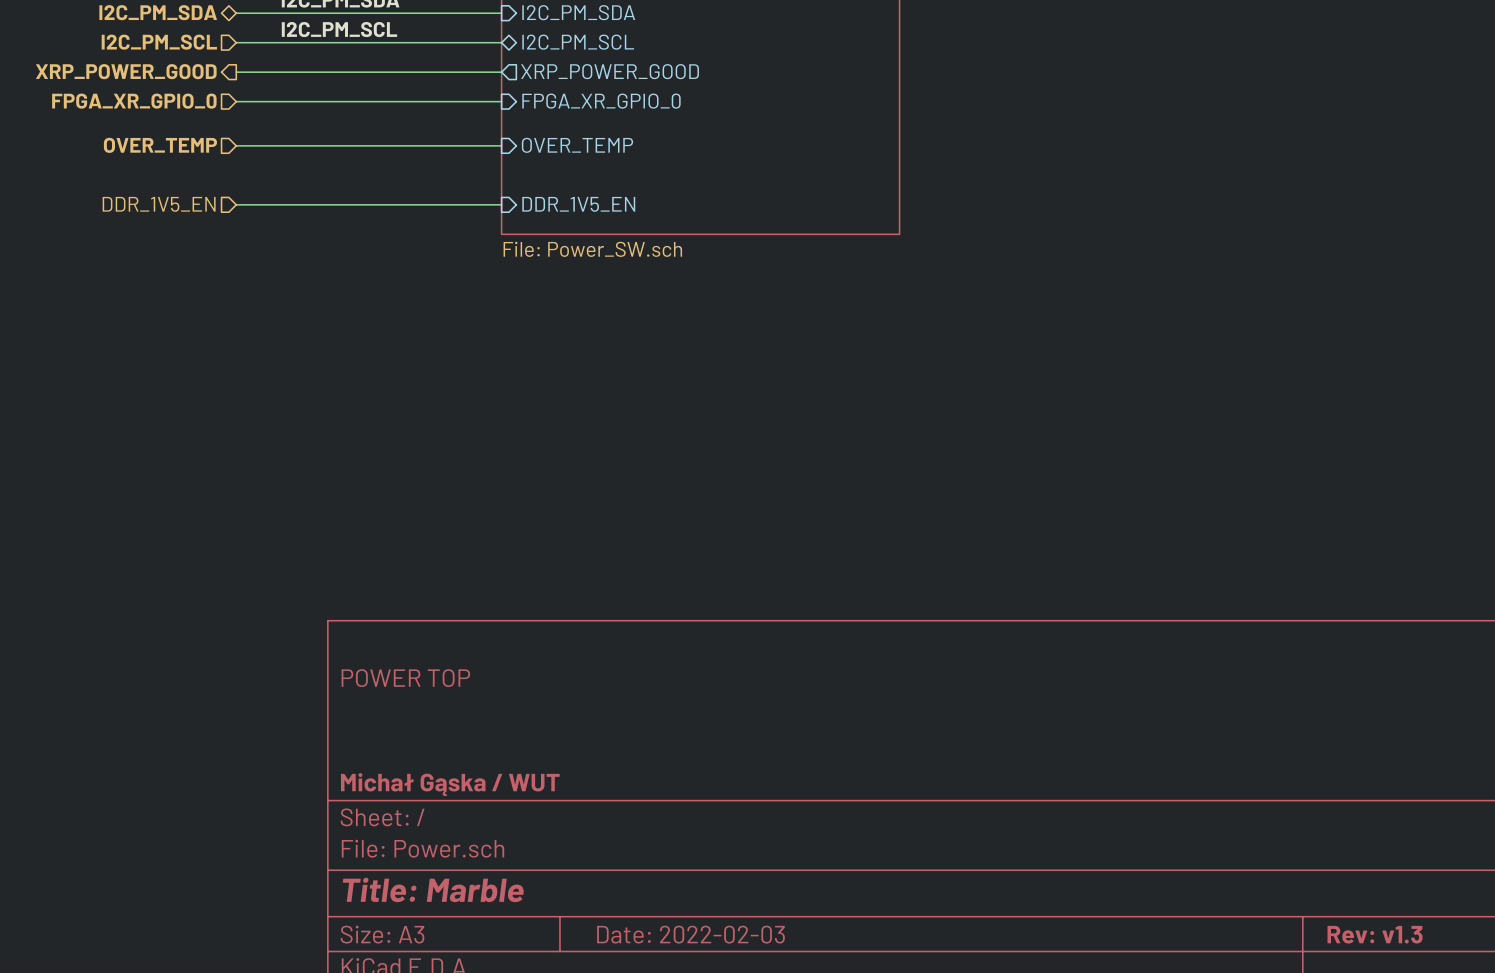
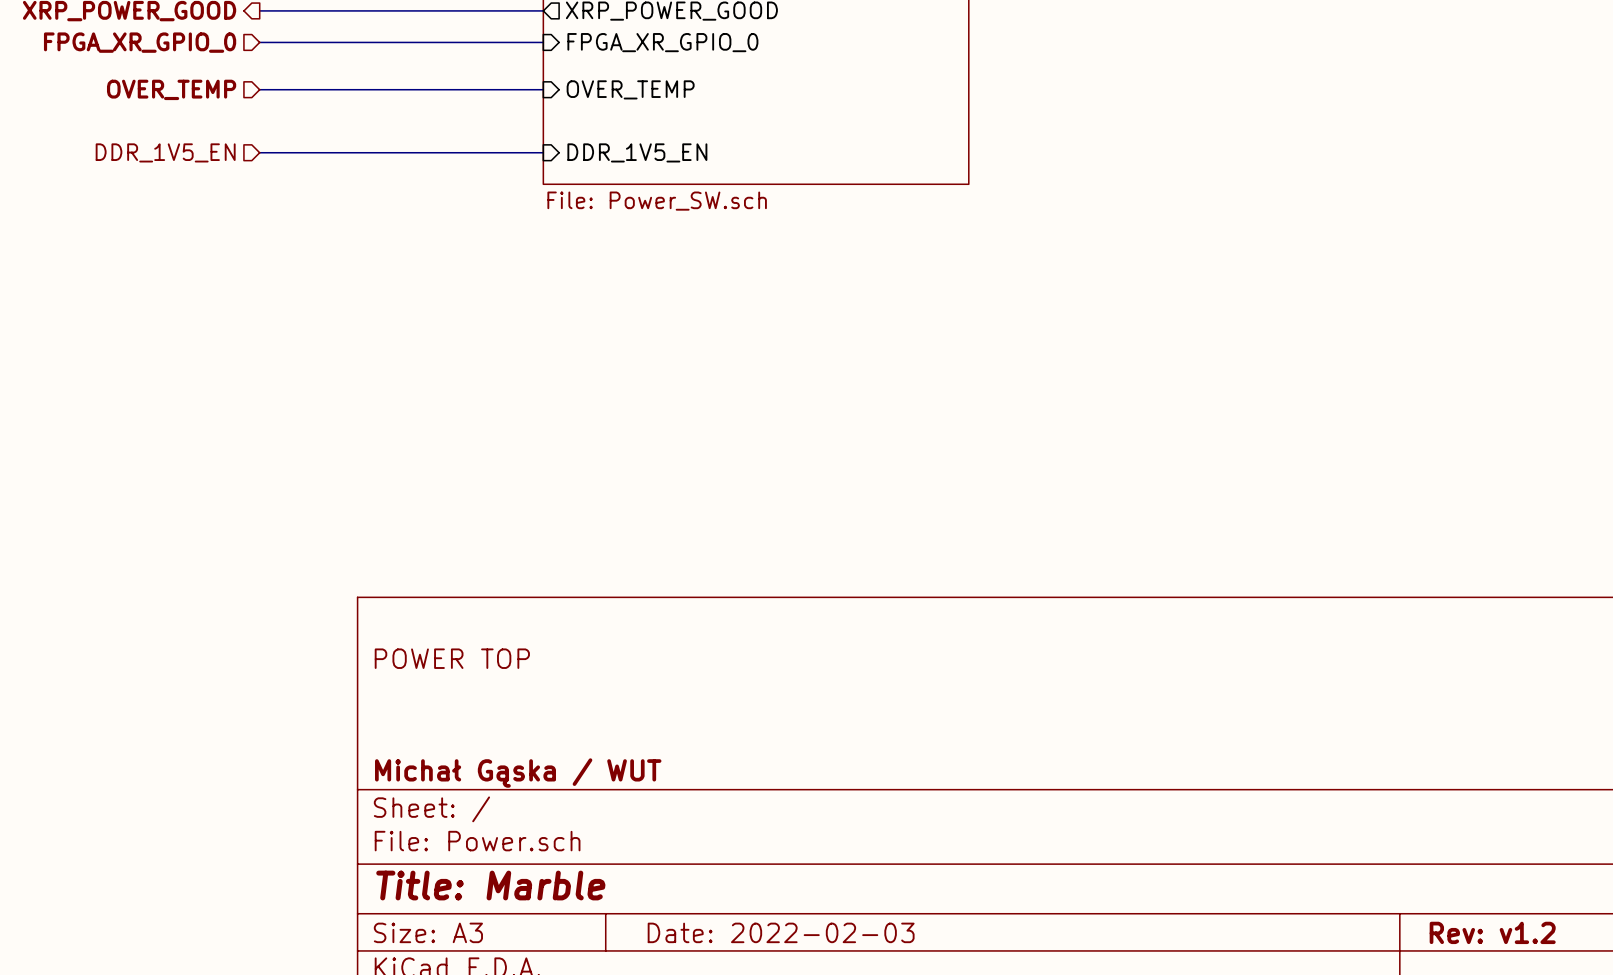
title block: Rev: v1.3 (1375, 934) -> Rev: v1.2 (1492, 932)

